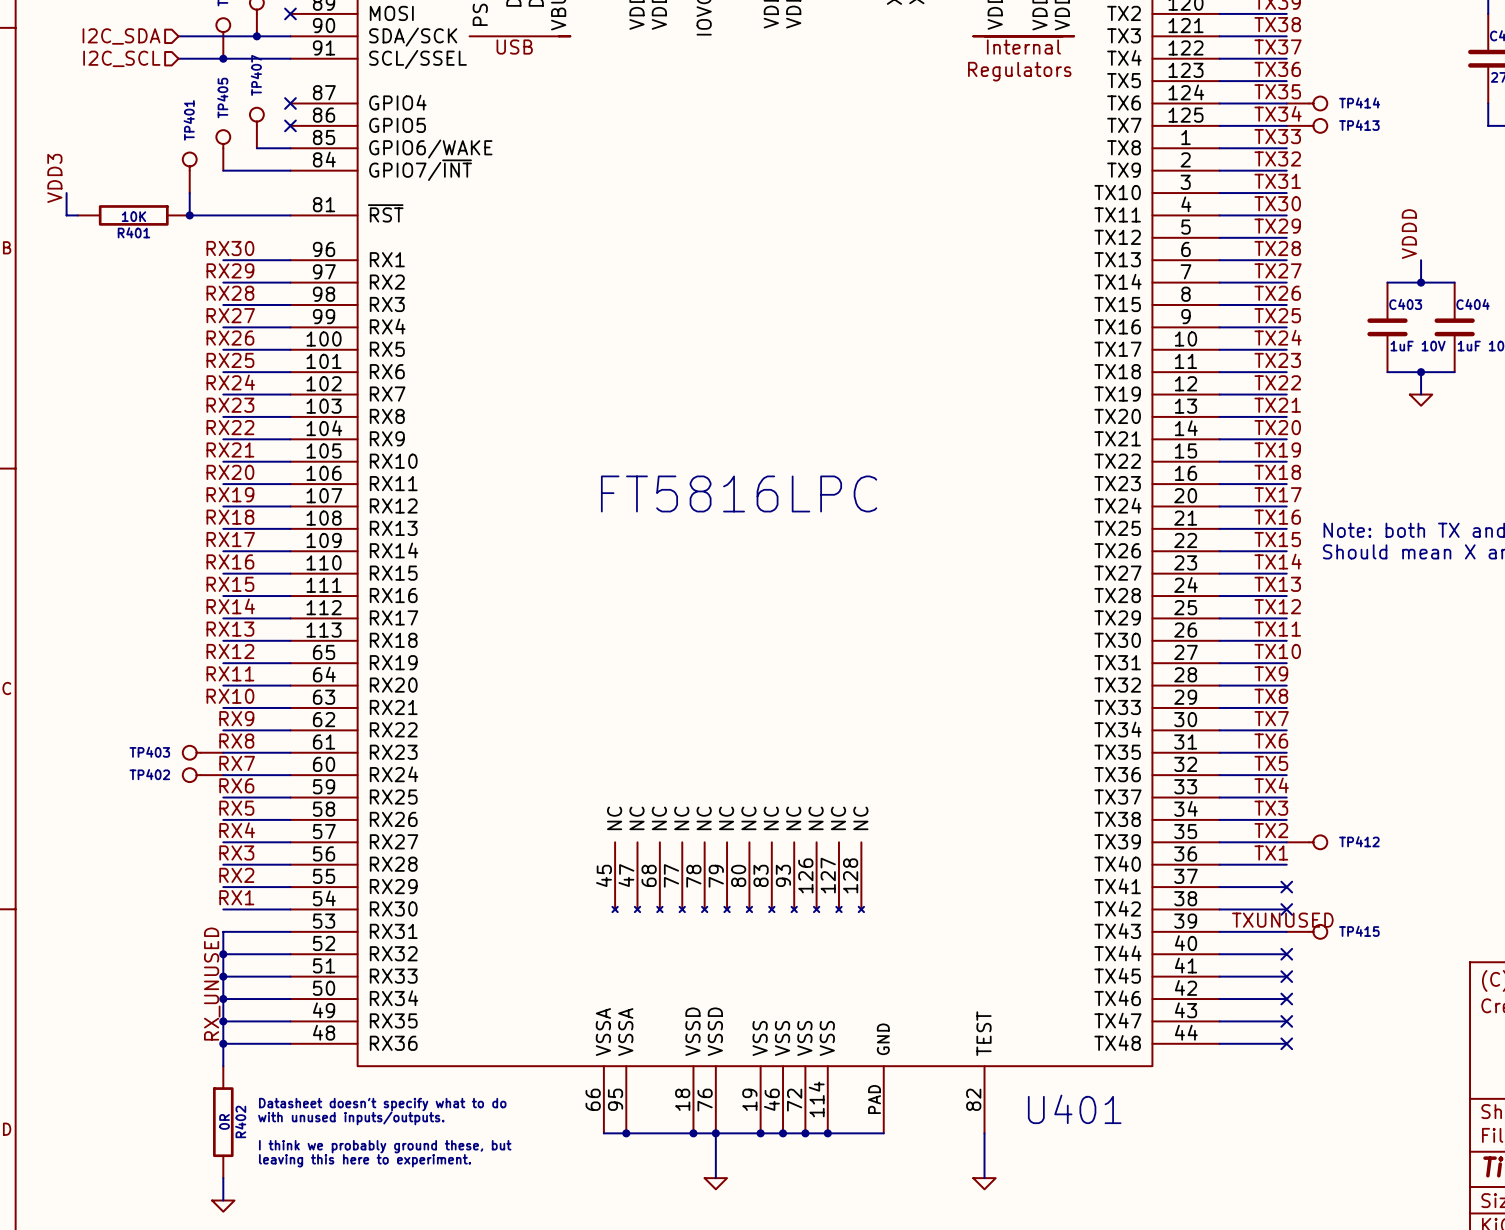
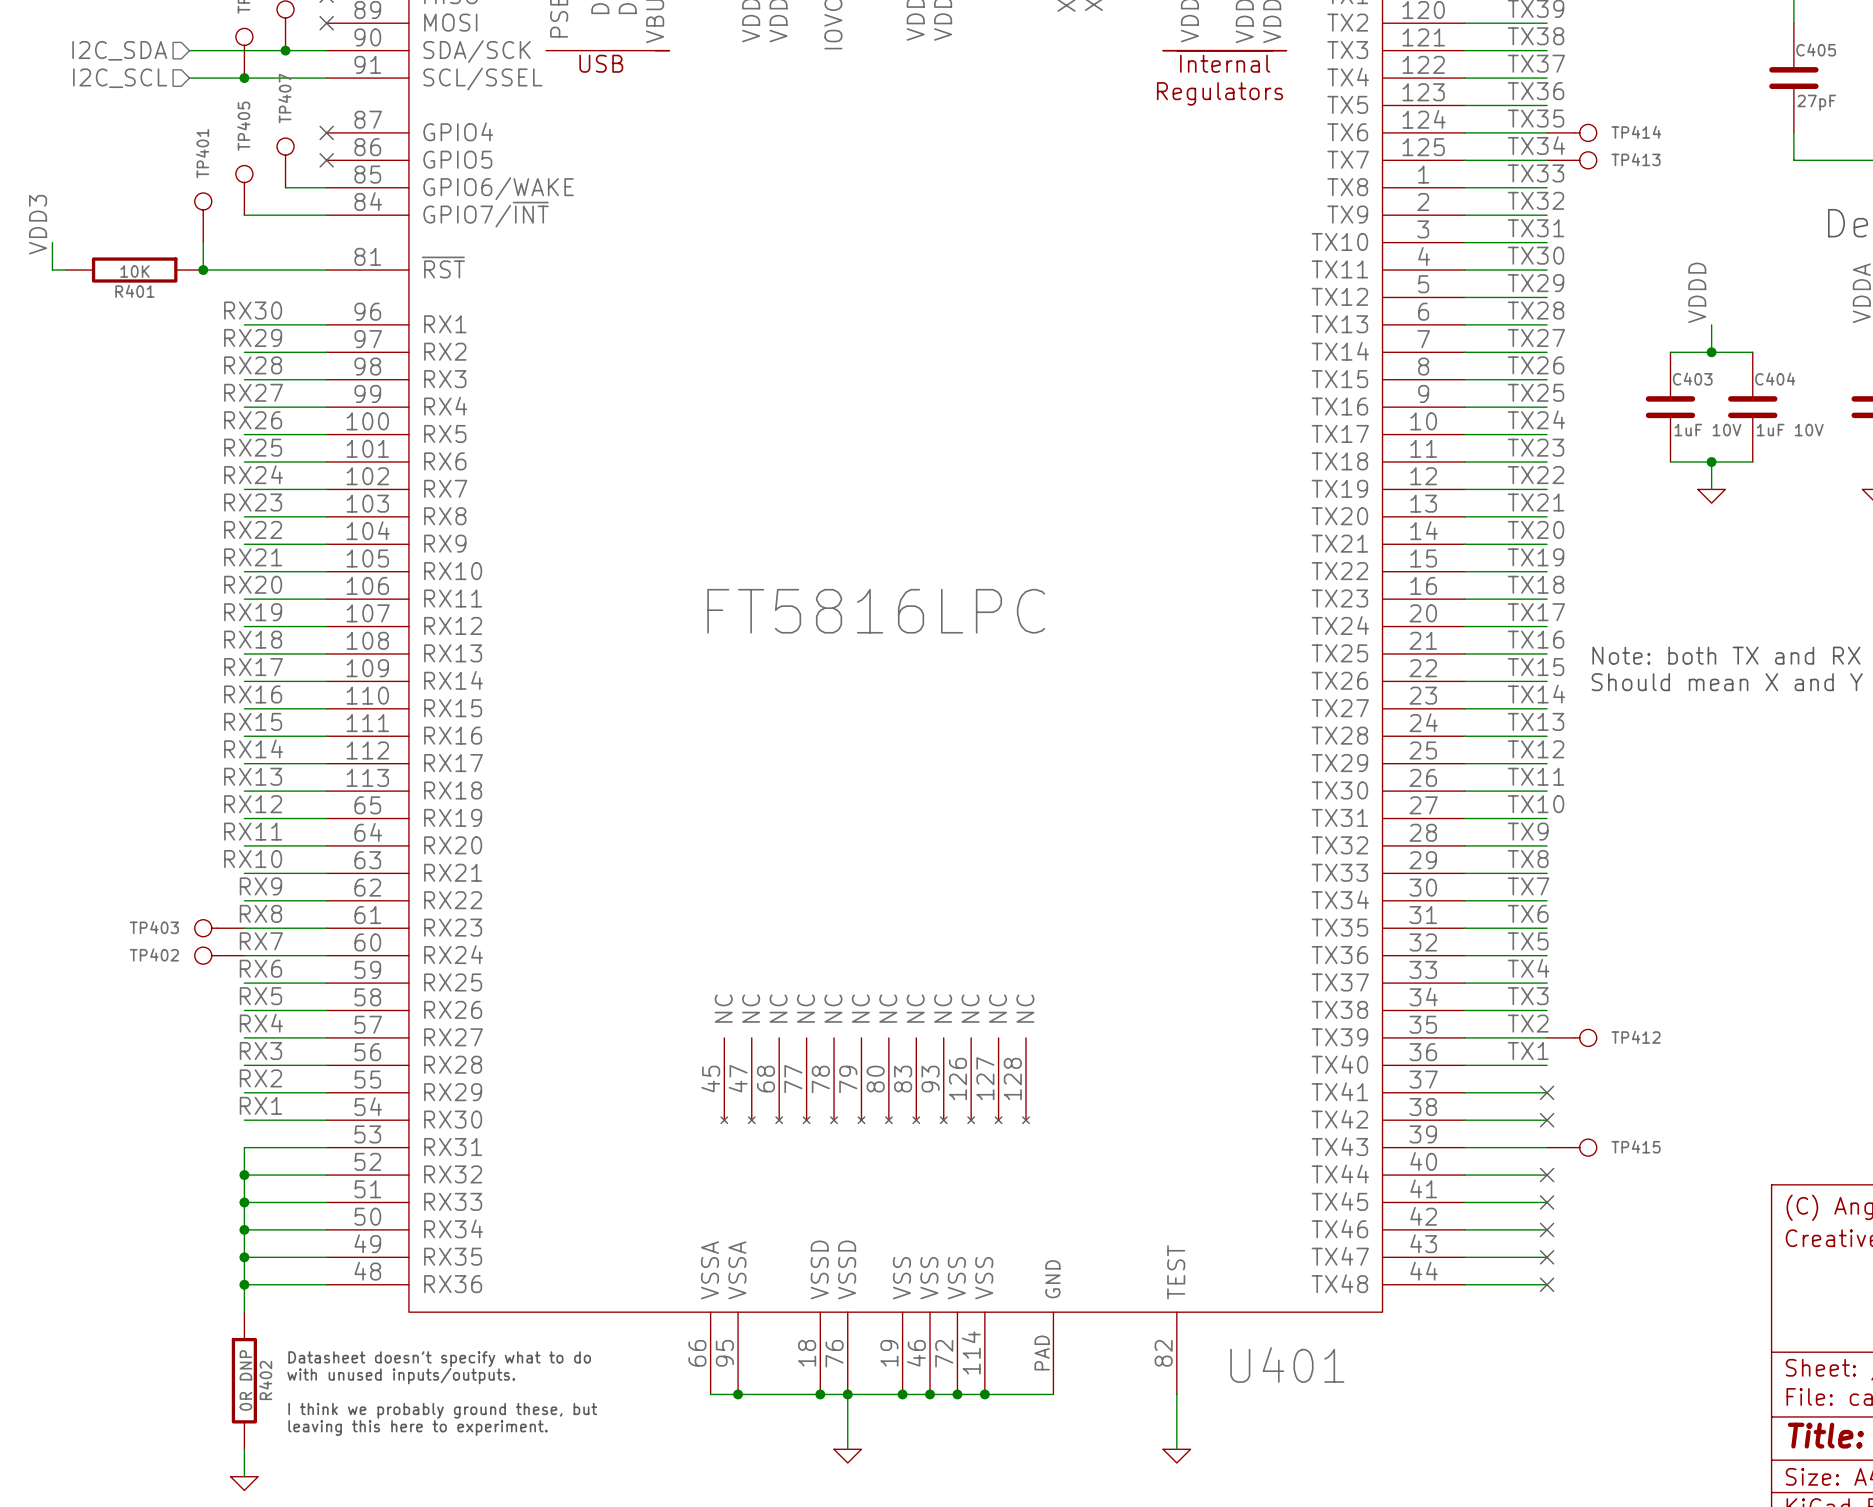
label: TXUNUSED (1282, 920) -> none
label: RX_UNUSED (212, 984) -> none
R402 value: 0R (224, 1121) -> 0R DNP (245, 1380)

